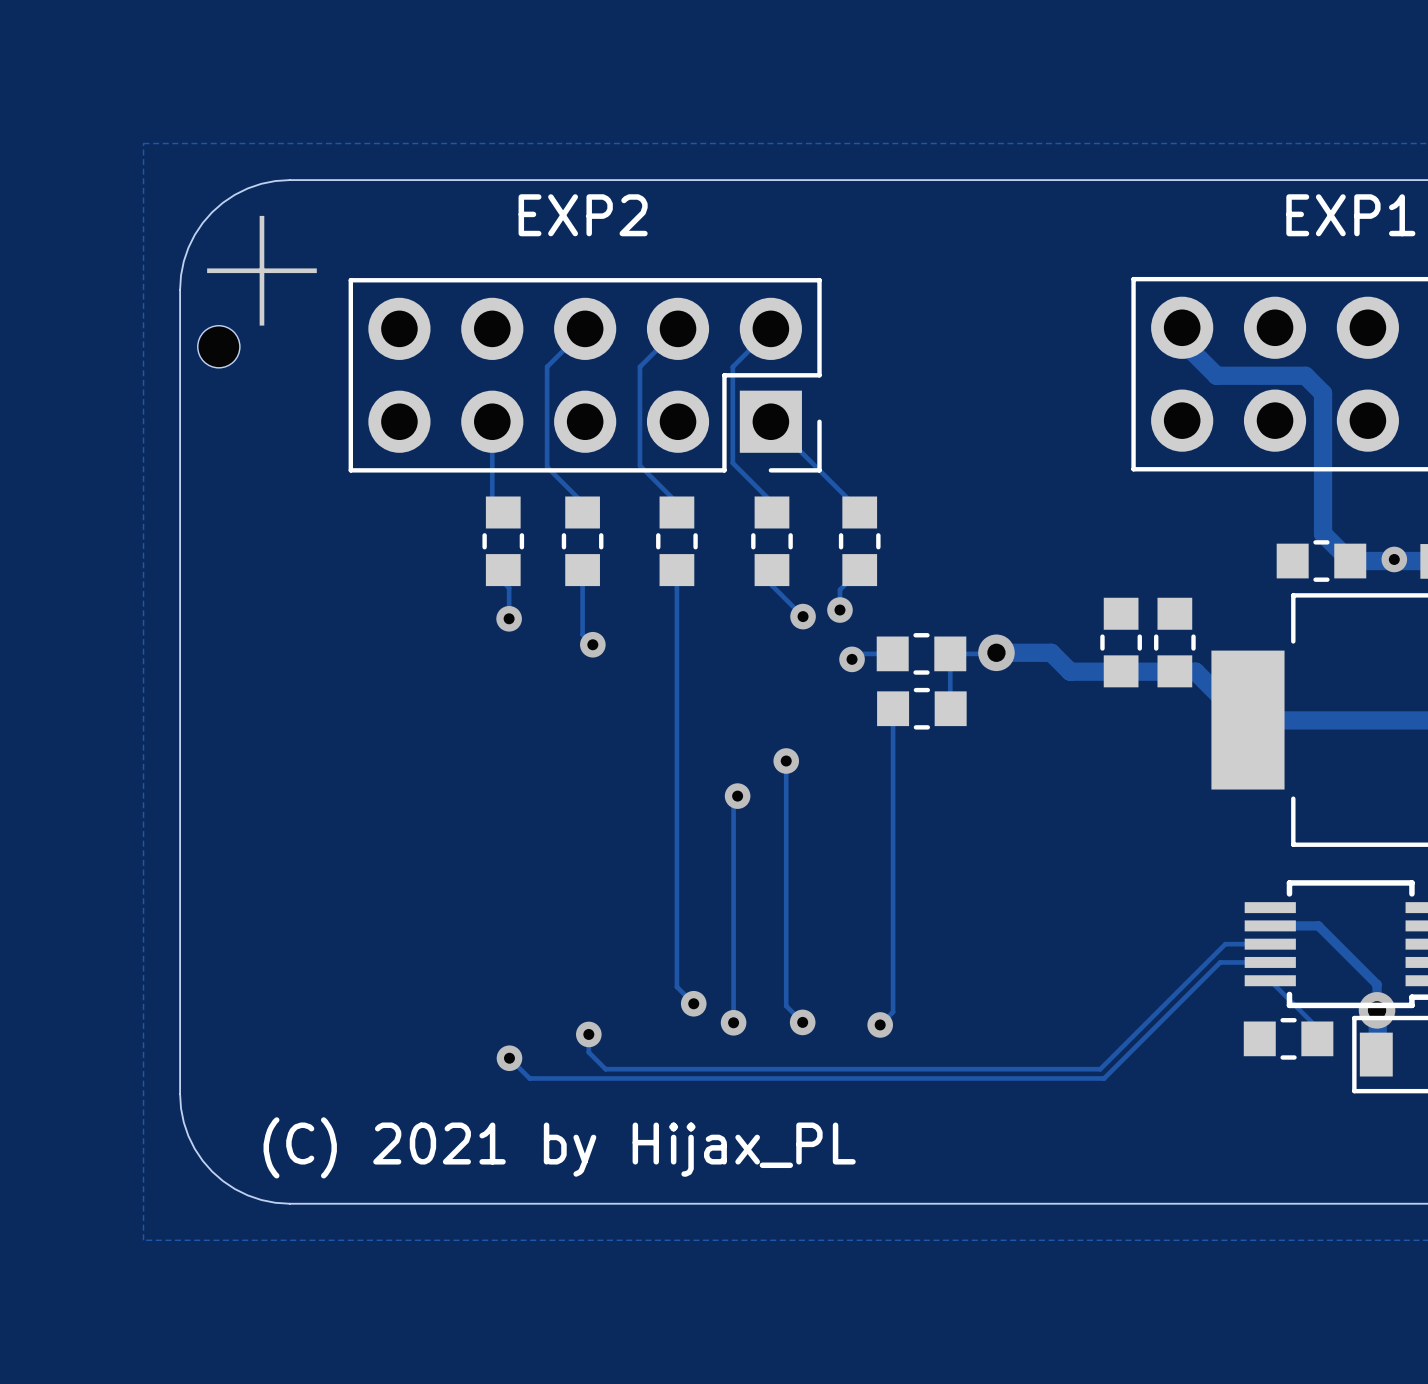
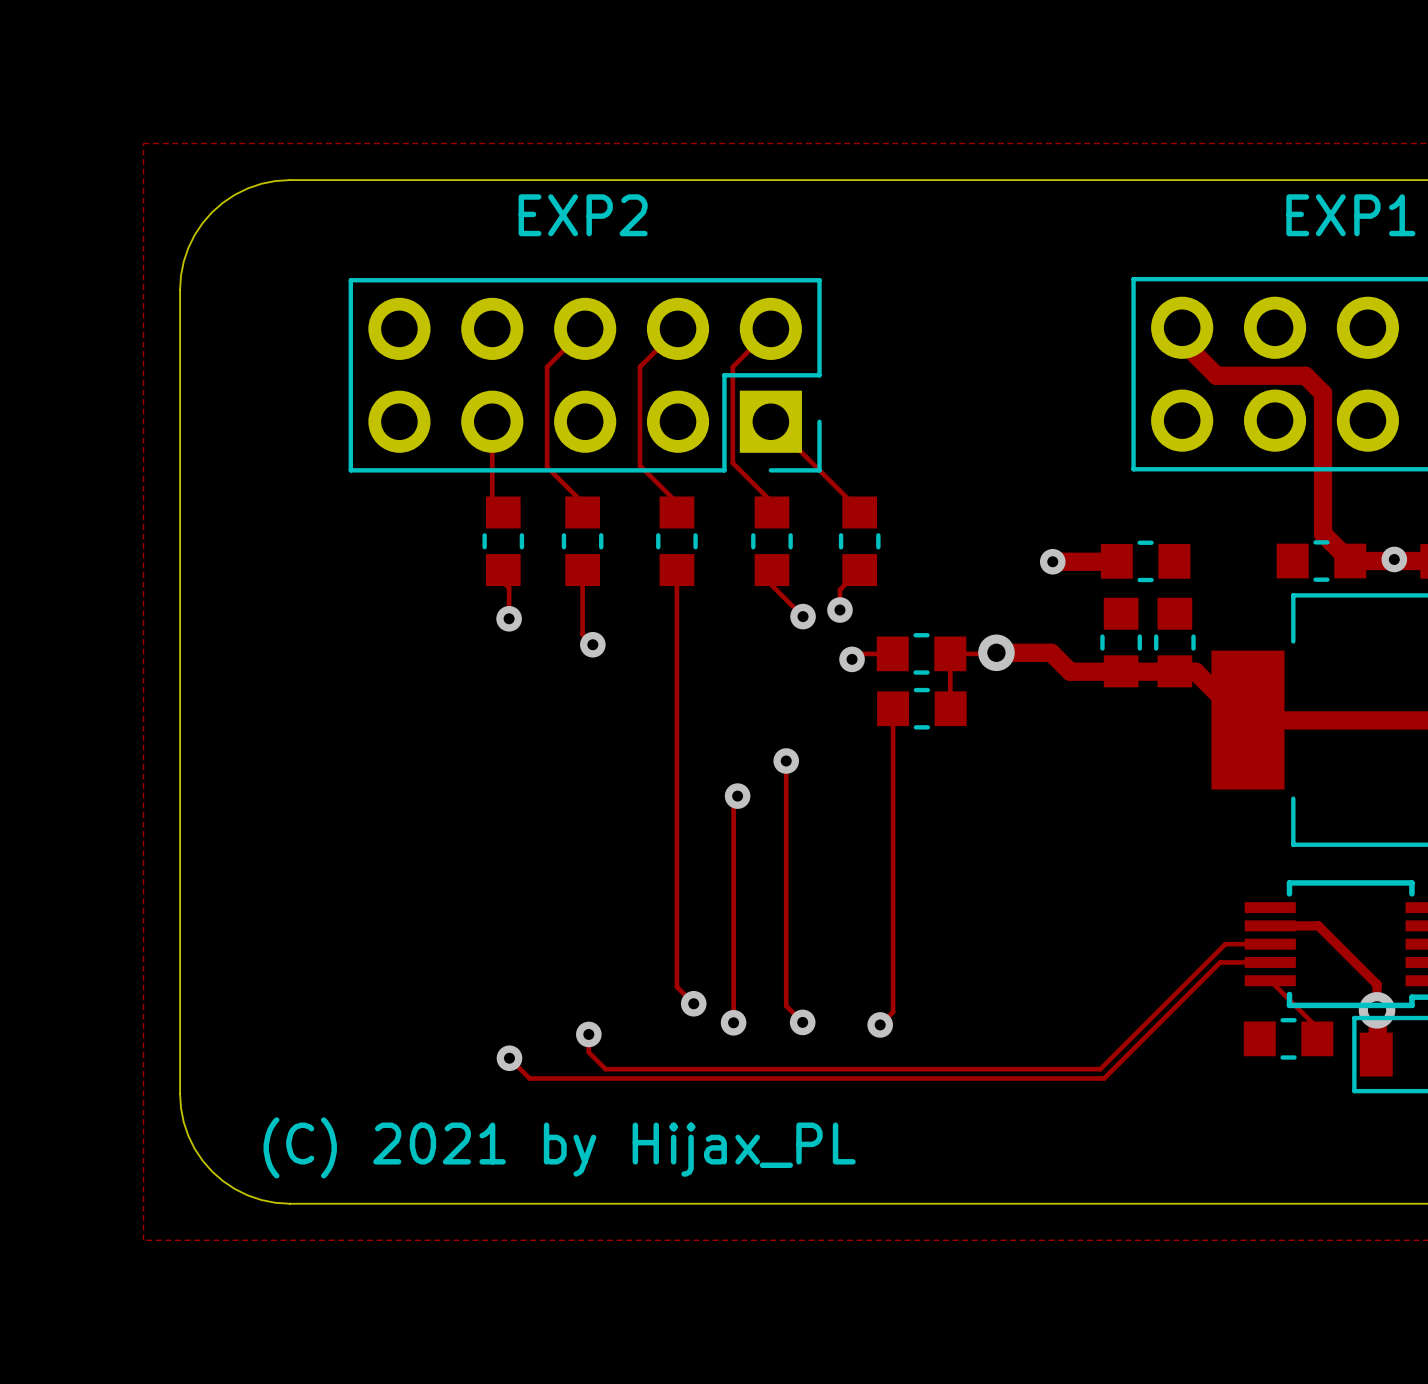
part: (261, 270) -> none
part: (218, 346) -> none
track: none -> (1052, 561) (1116, 561)
via: none -> (1052, 561)
part: none -> (1145, 561)

